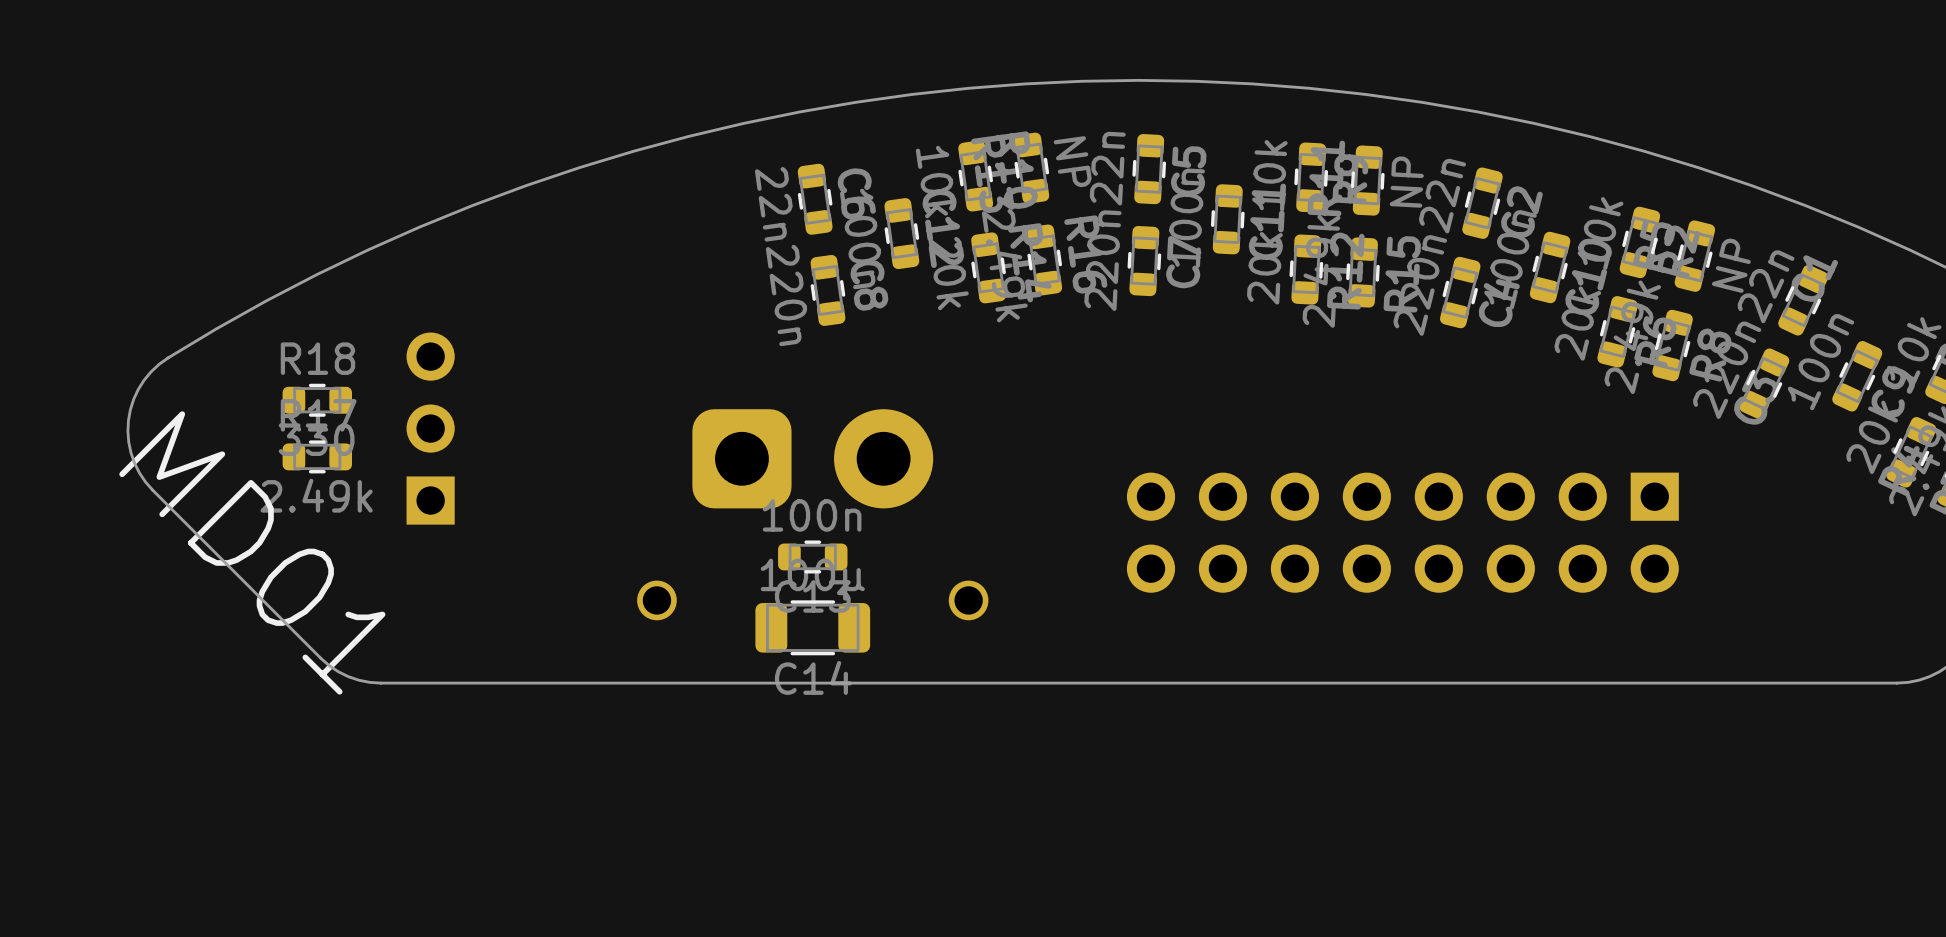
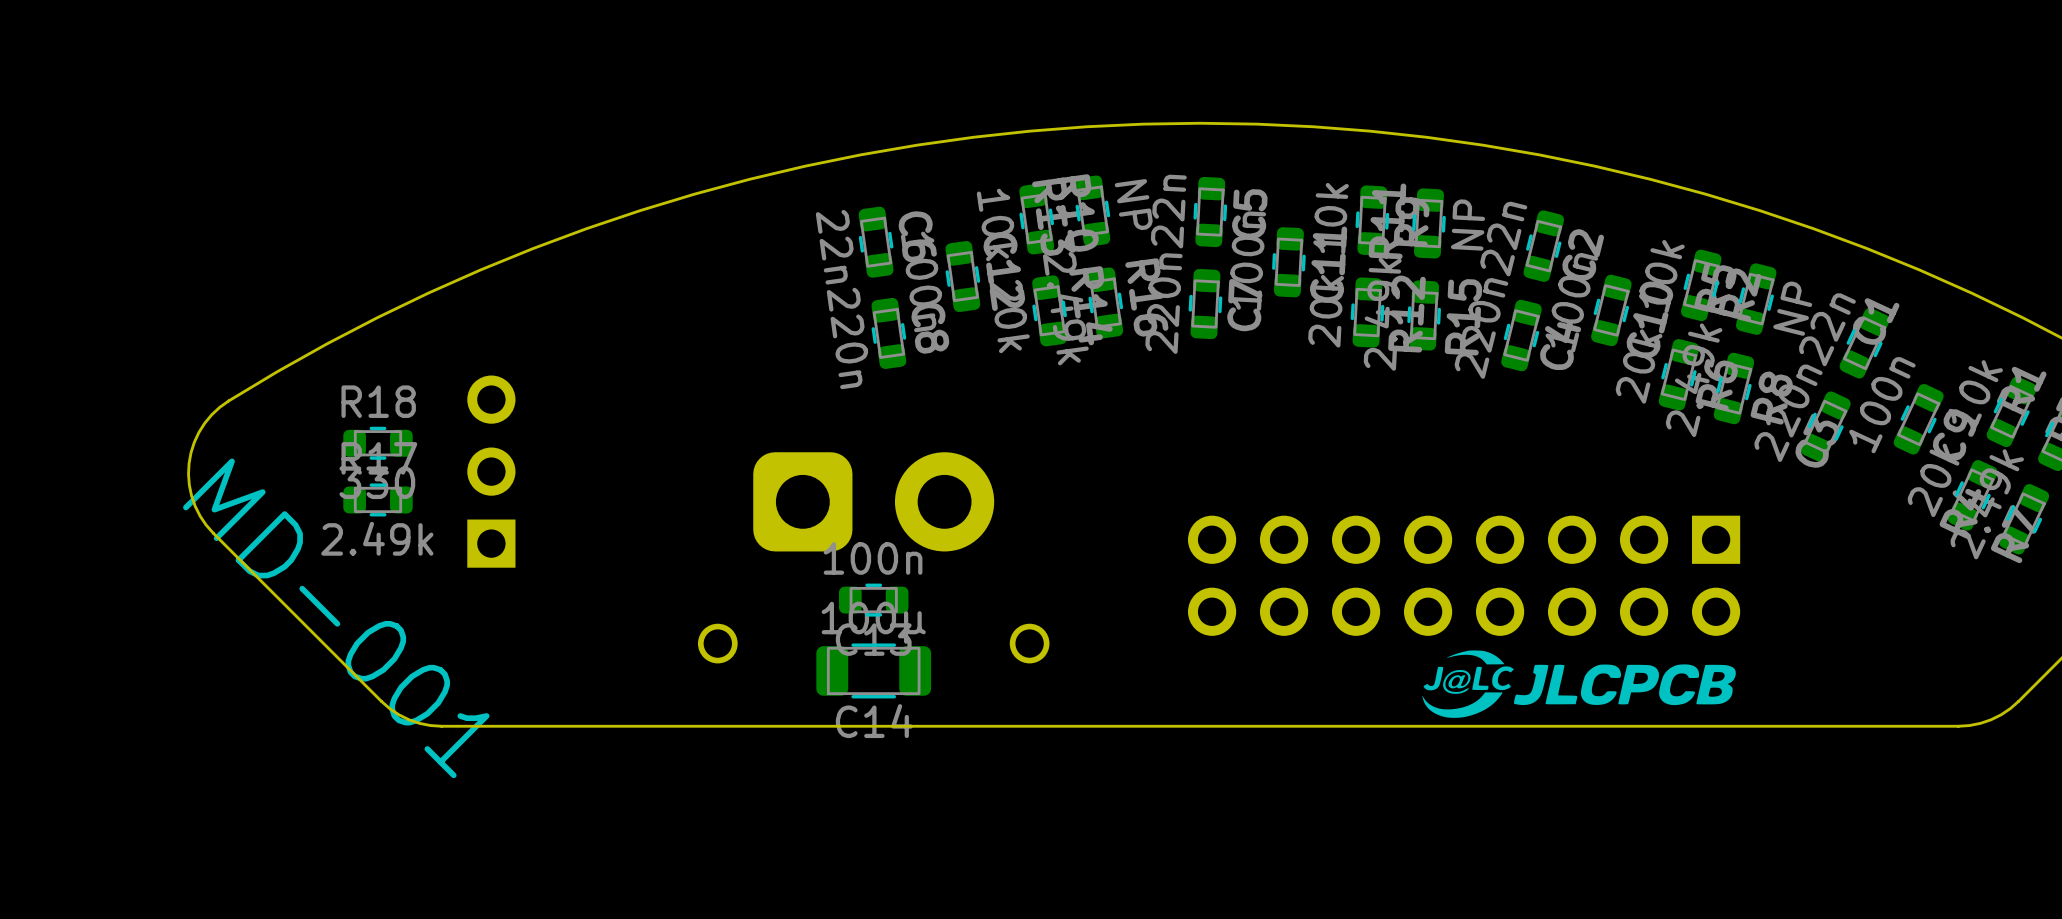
text: MD01 (252, 552) -> MD-001 (336, 618)
drawing: none -> [1422, 650, 1736, 718]

